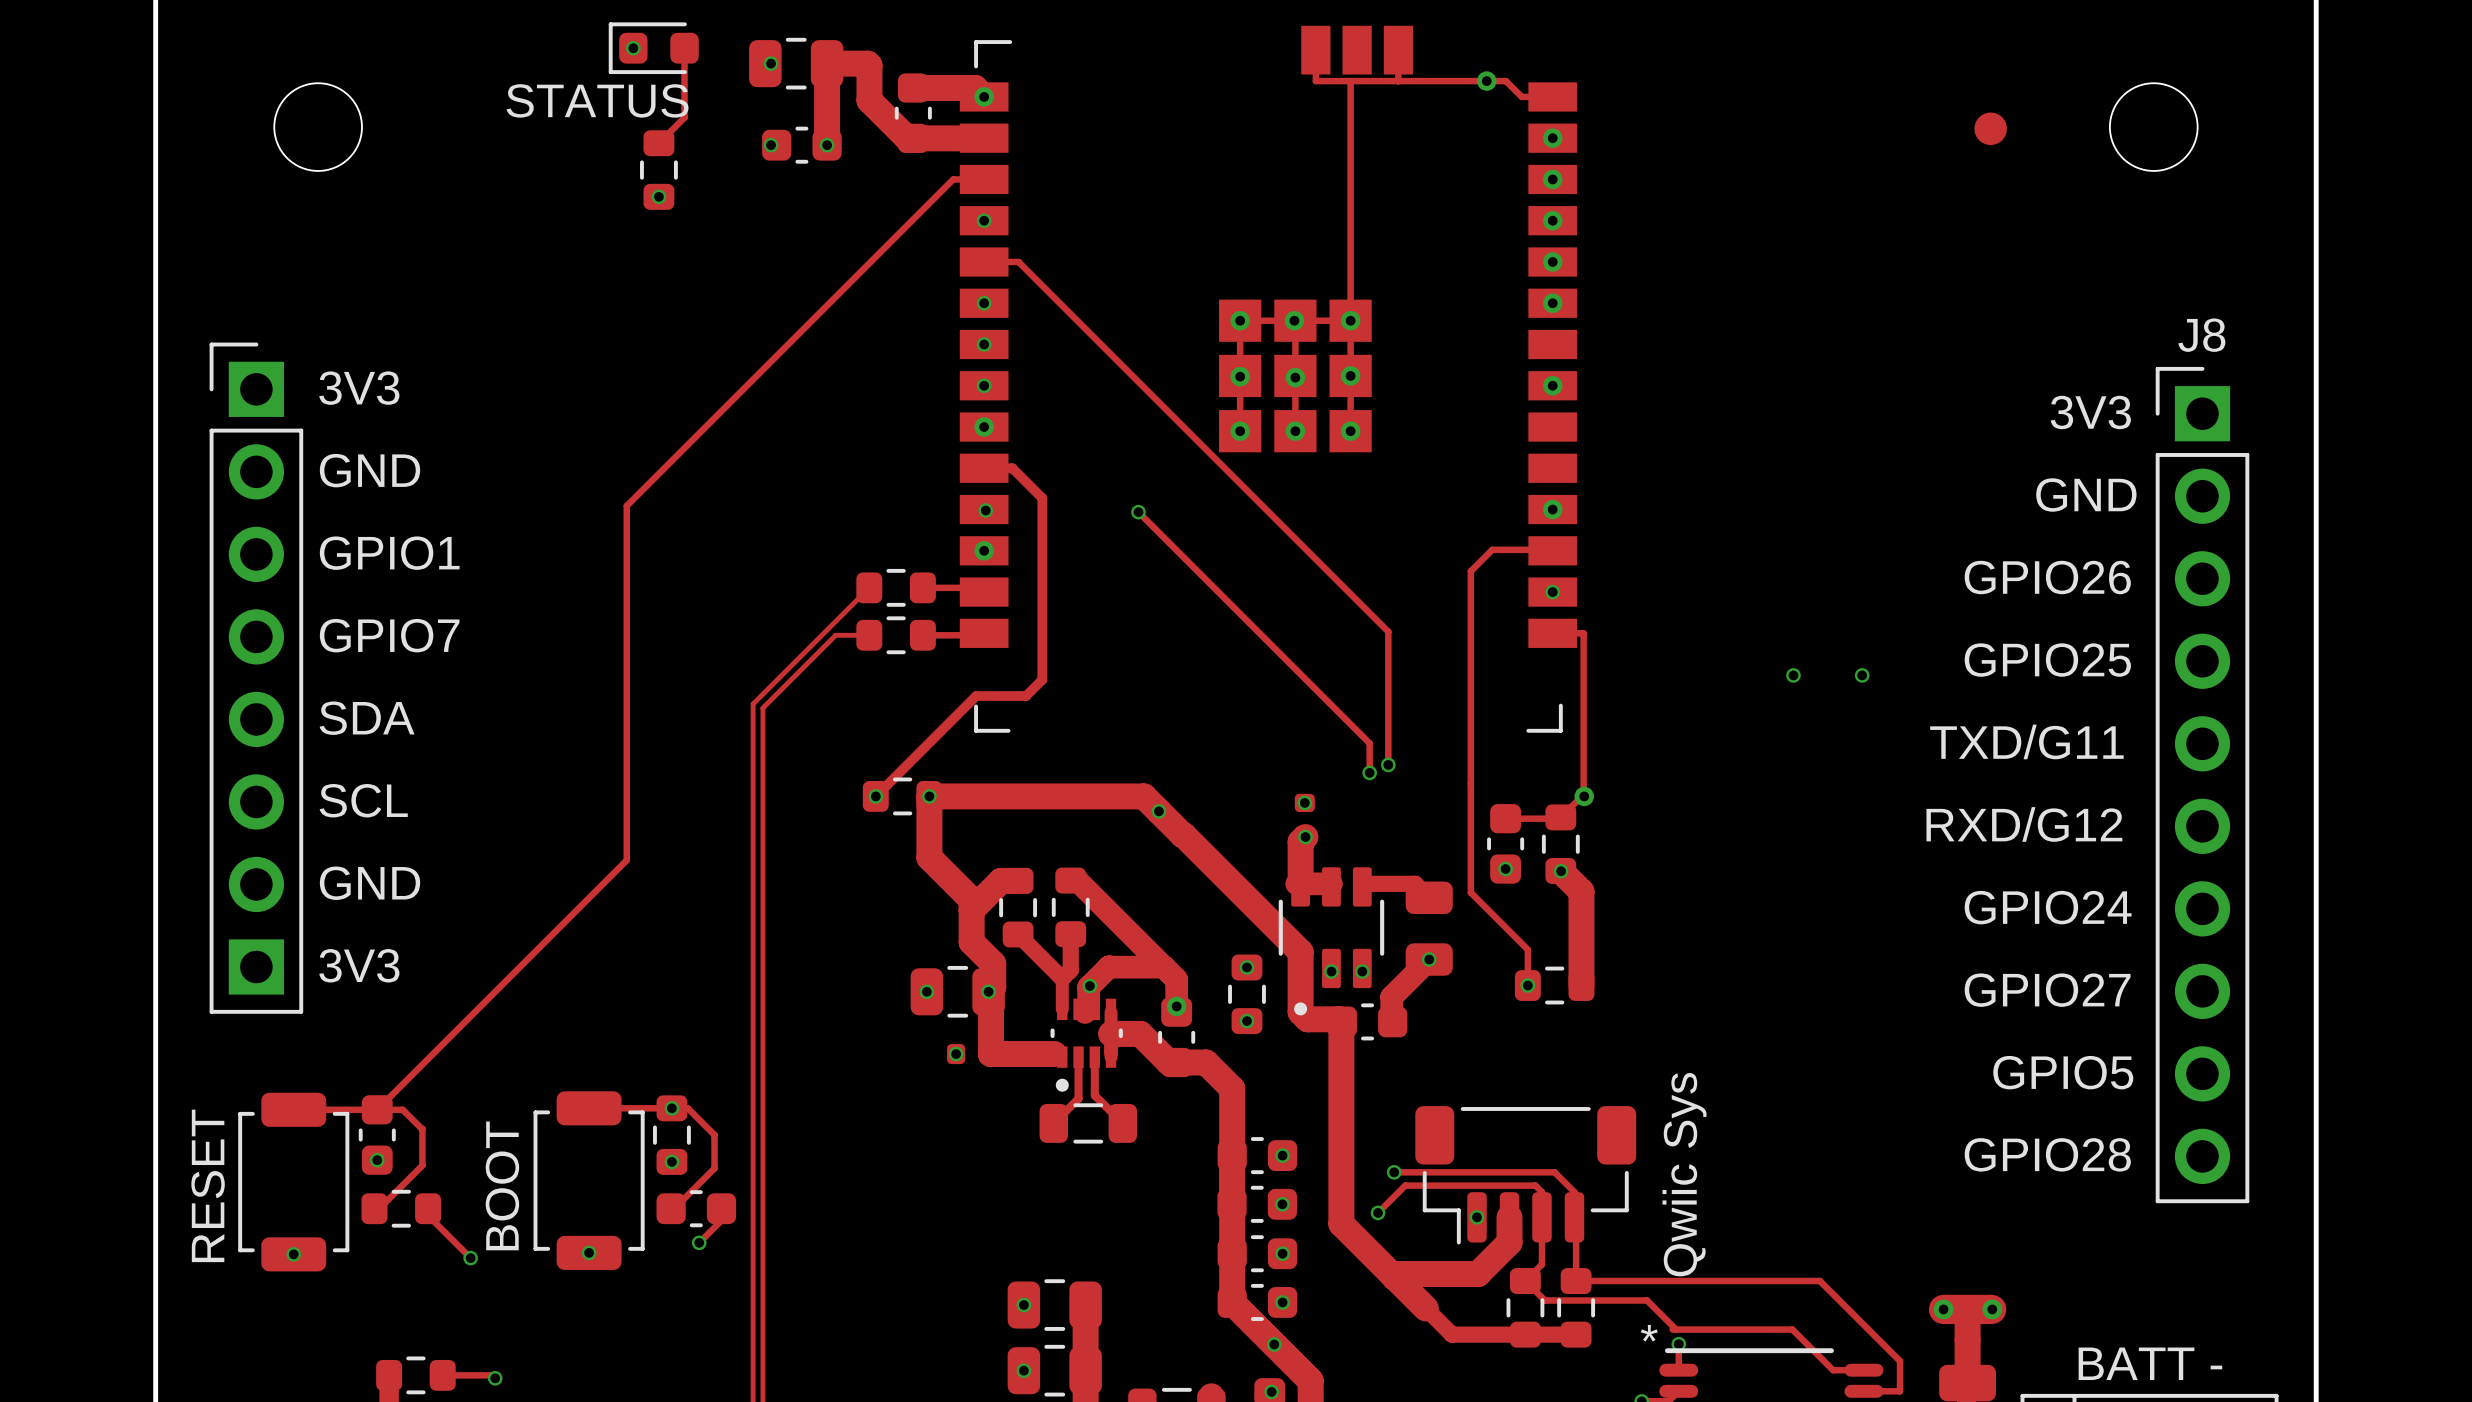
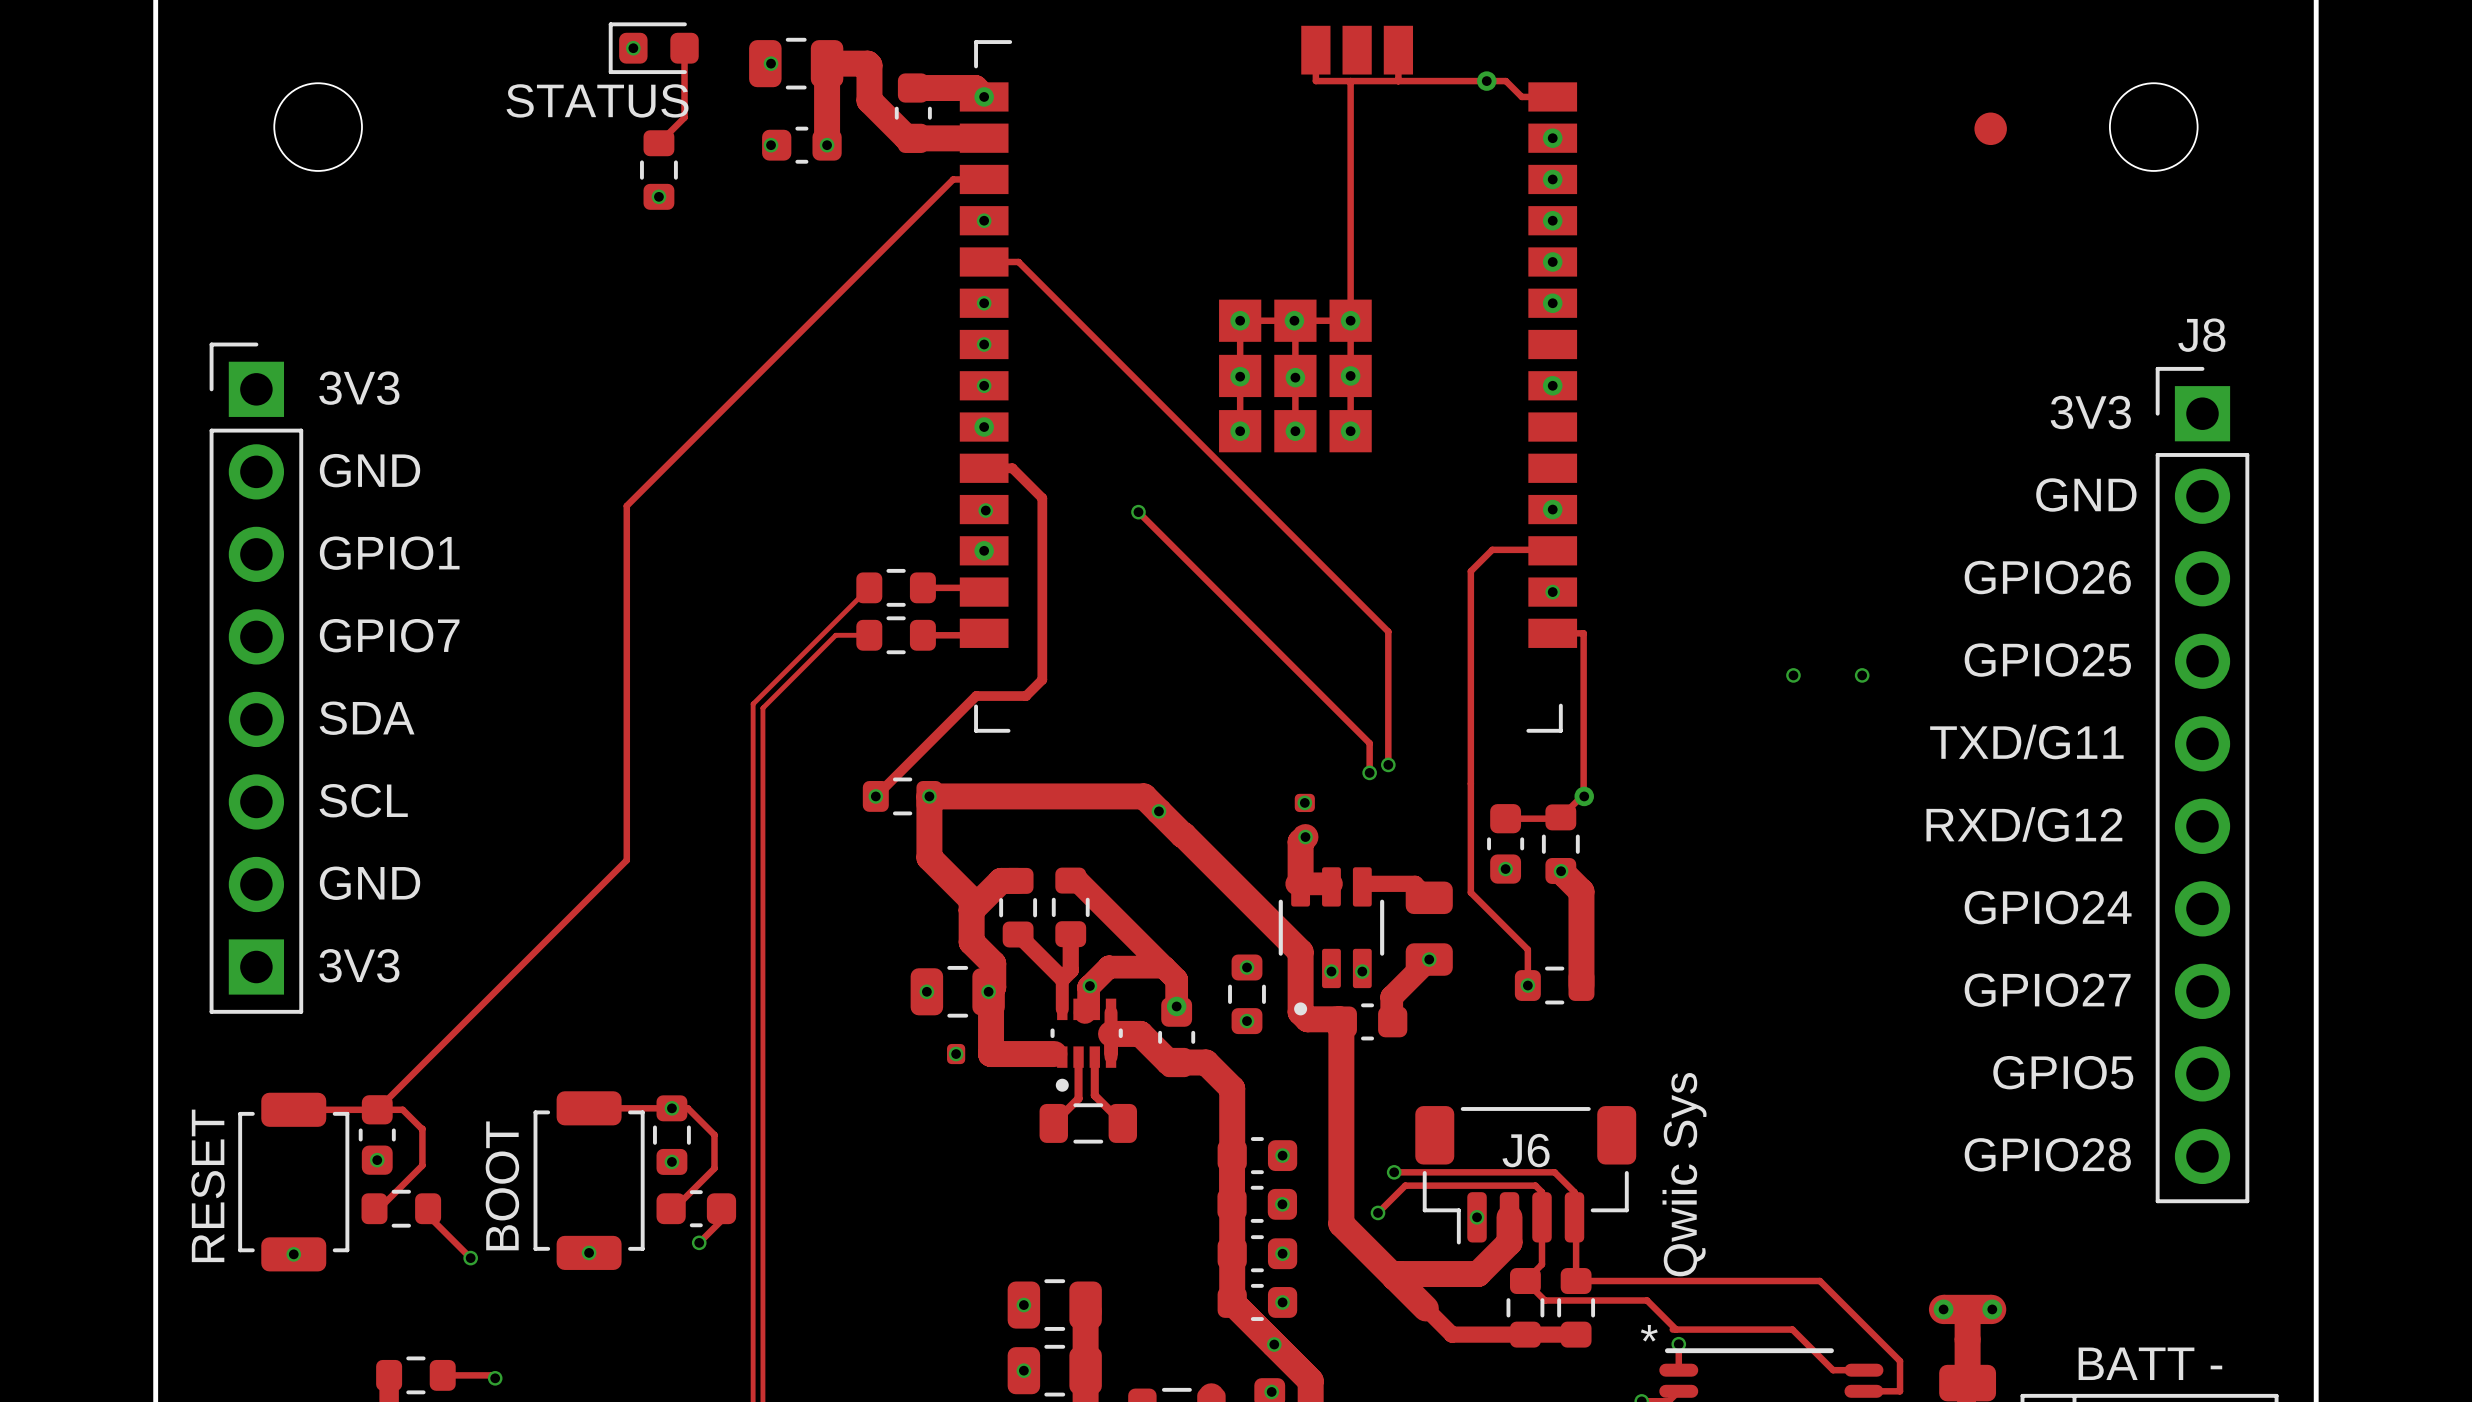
J6 name: none -> J6 (1526, 1150)

